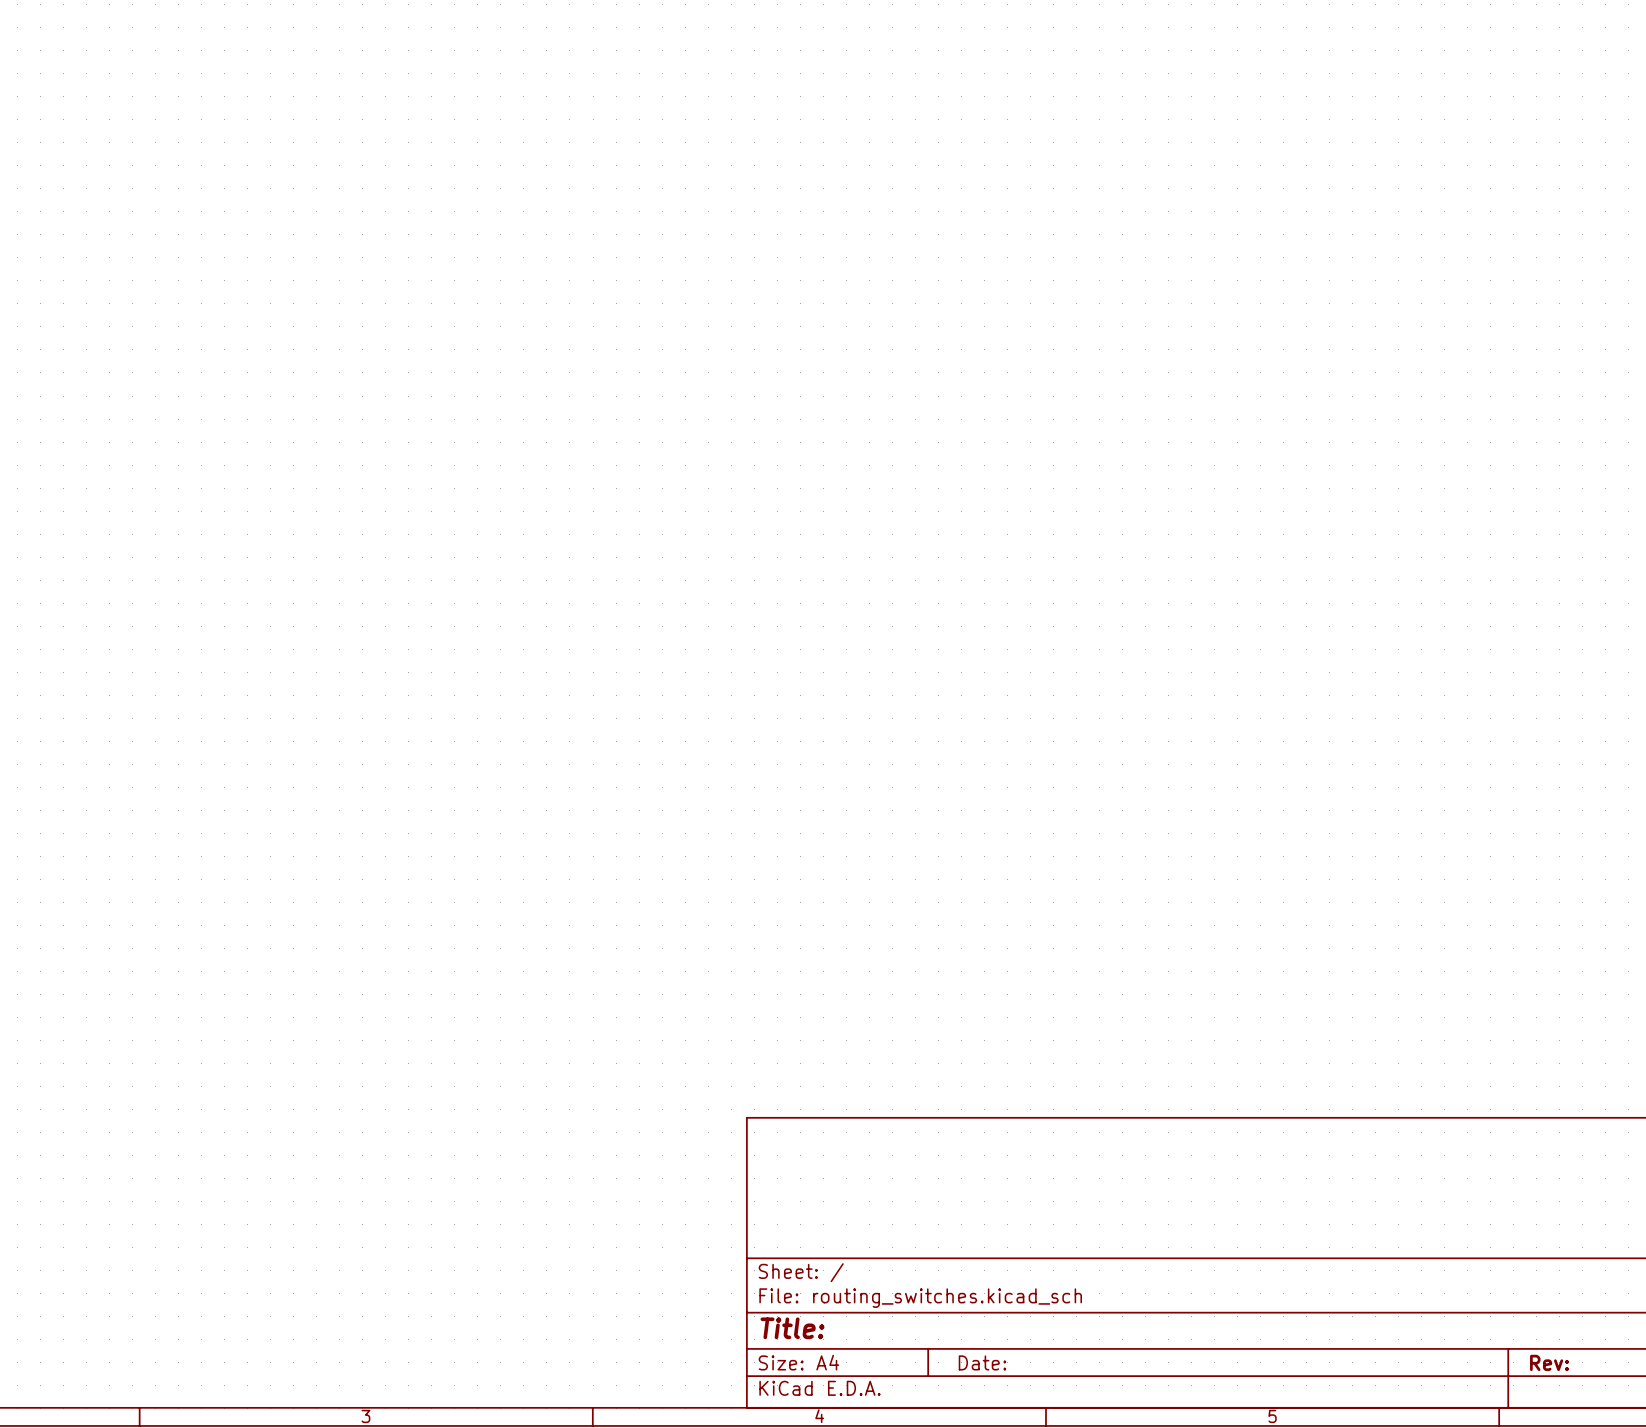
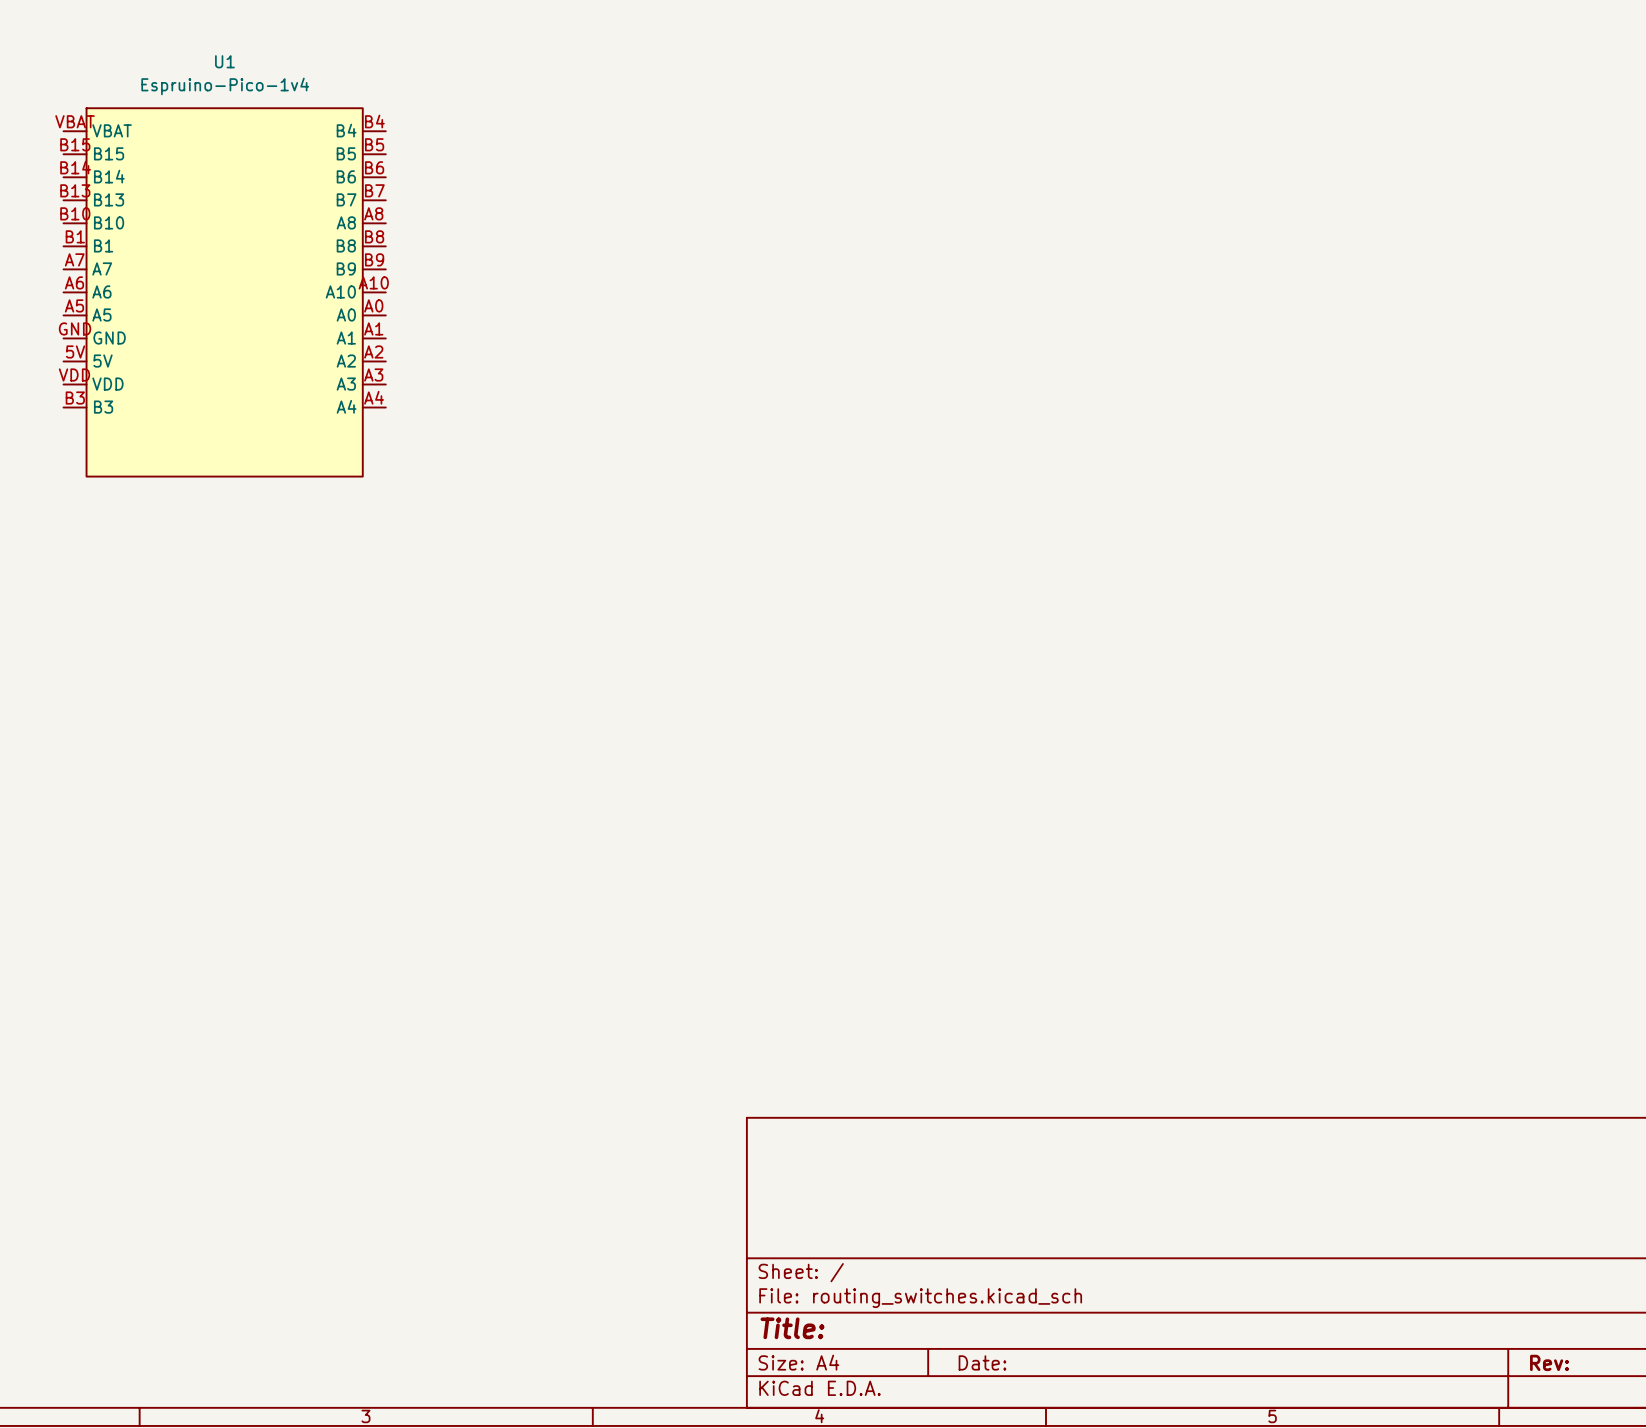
U1: none -> Espruino-Pico-1v4 (224, 292)

